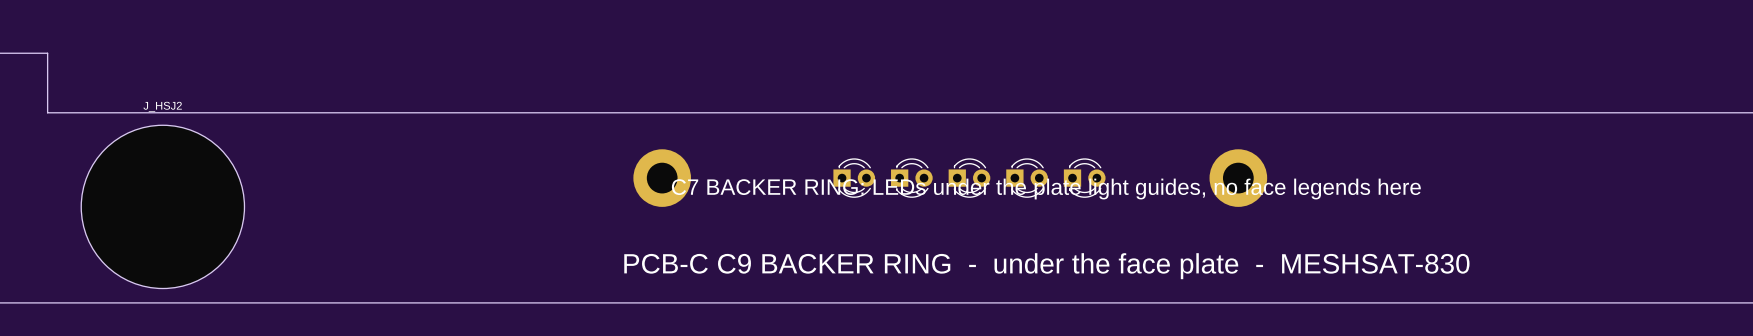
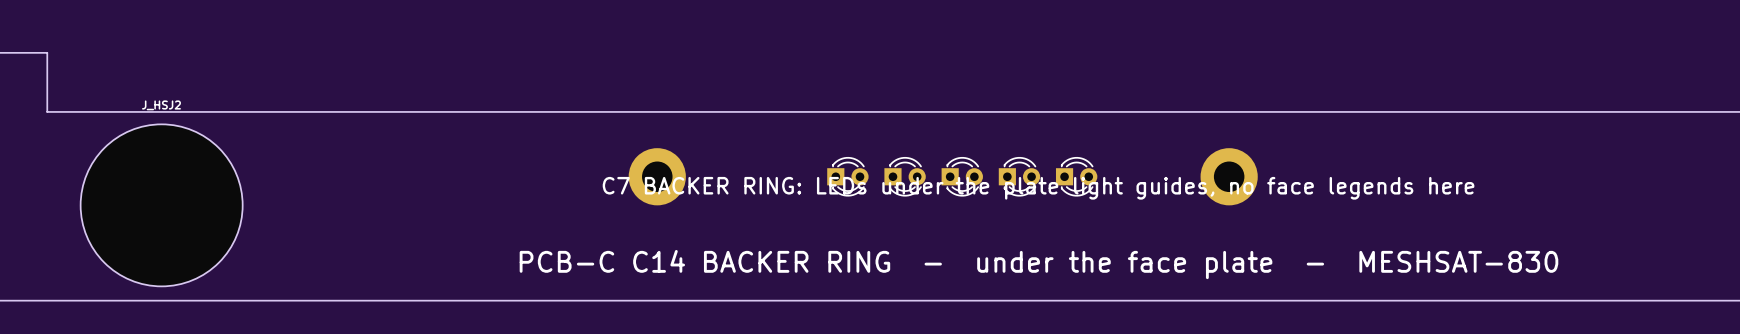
text: PCB-C C9 BACKER RING - under the face plate - MESHSAT-830 (1046, 266) -> PCB-C C14 BACKER RING - under the face plate - MESHSAT-830 (1038, 264)

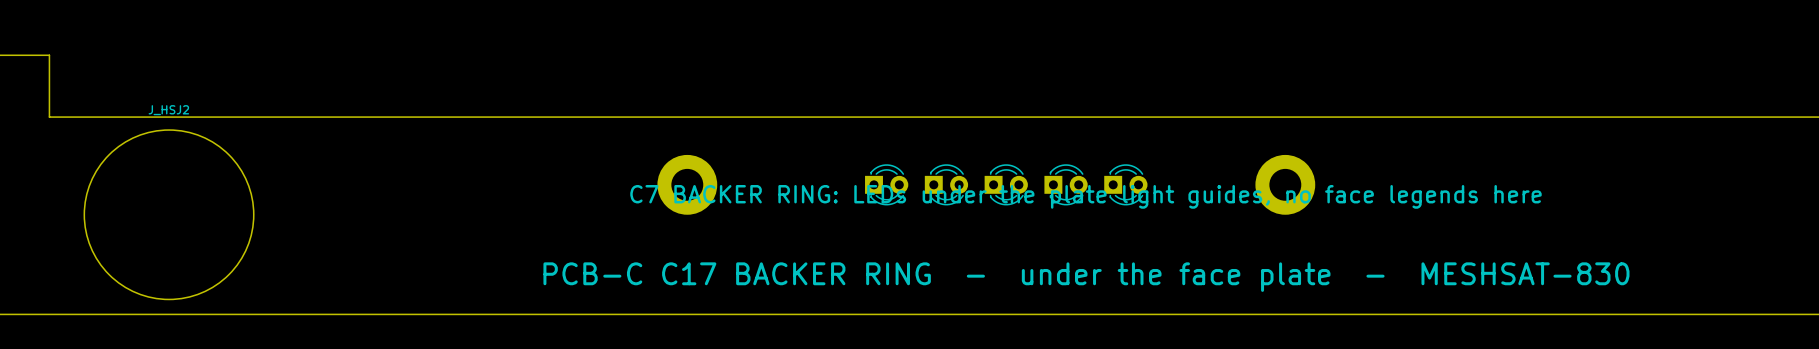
text: PCB-C C14 BACKER RING - under the face plate - MESHSAT-830 (1038, 264) -> PCB-C C17 BACKER RING - under the face plate - MESHSAT-830 (1086, 277)

